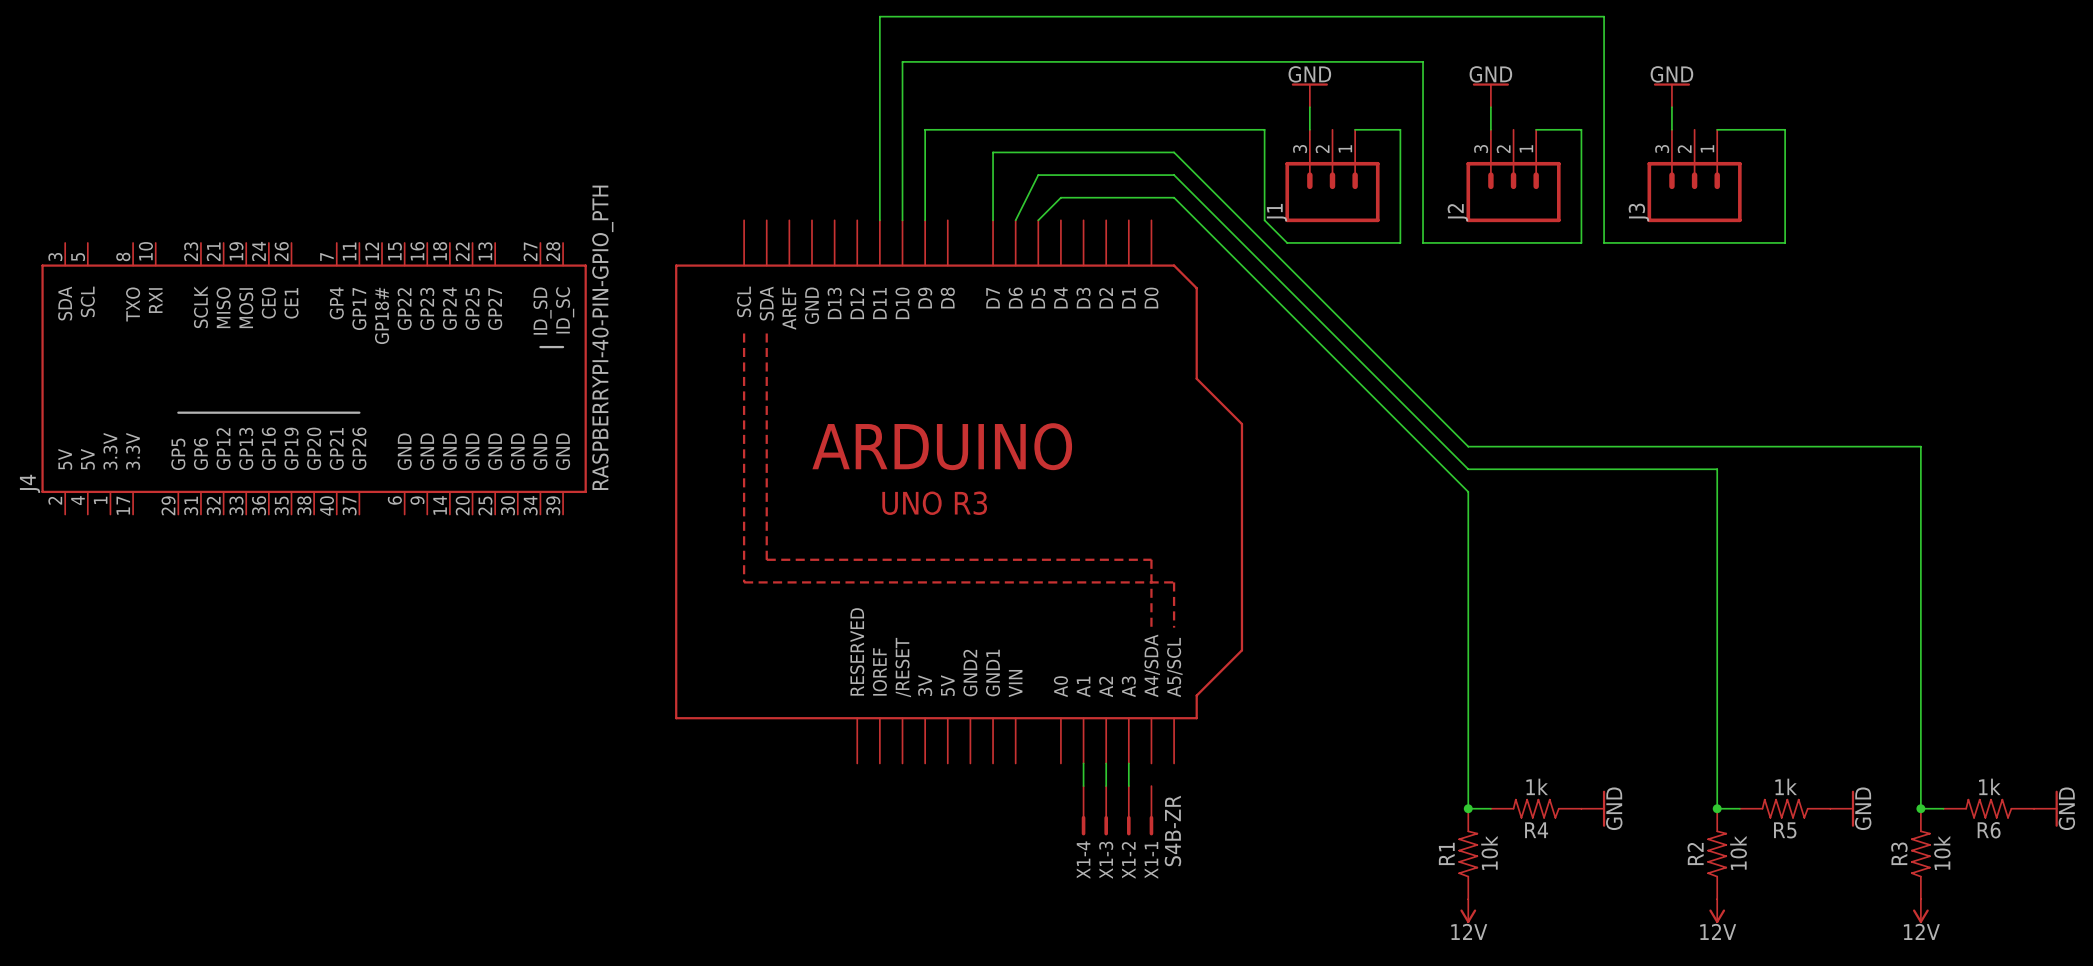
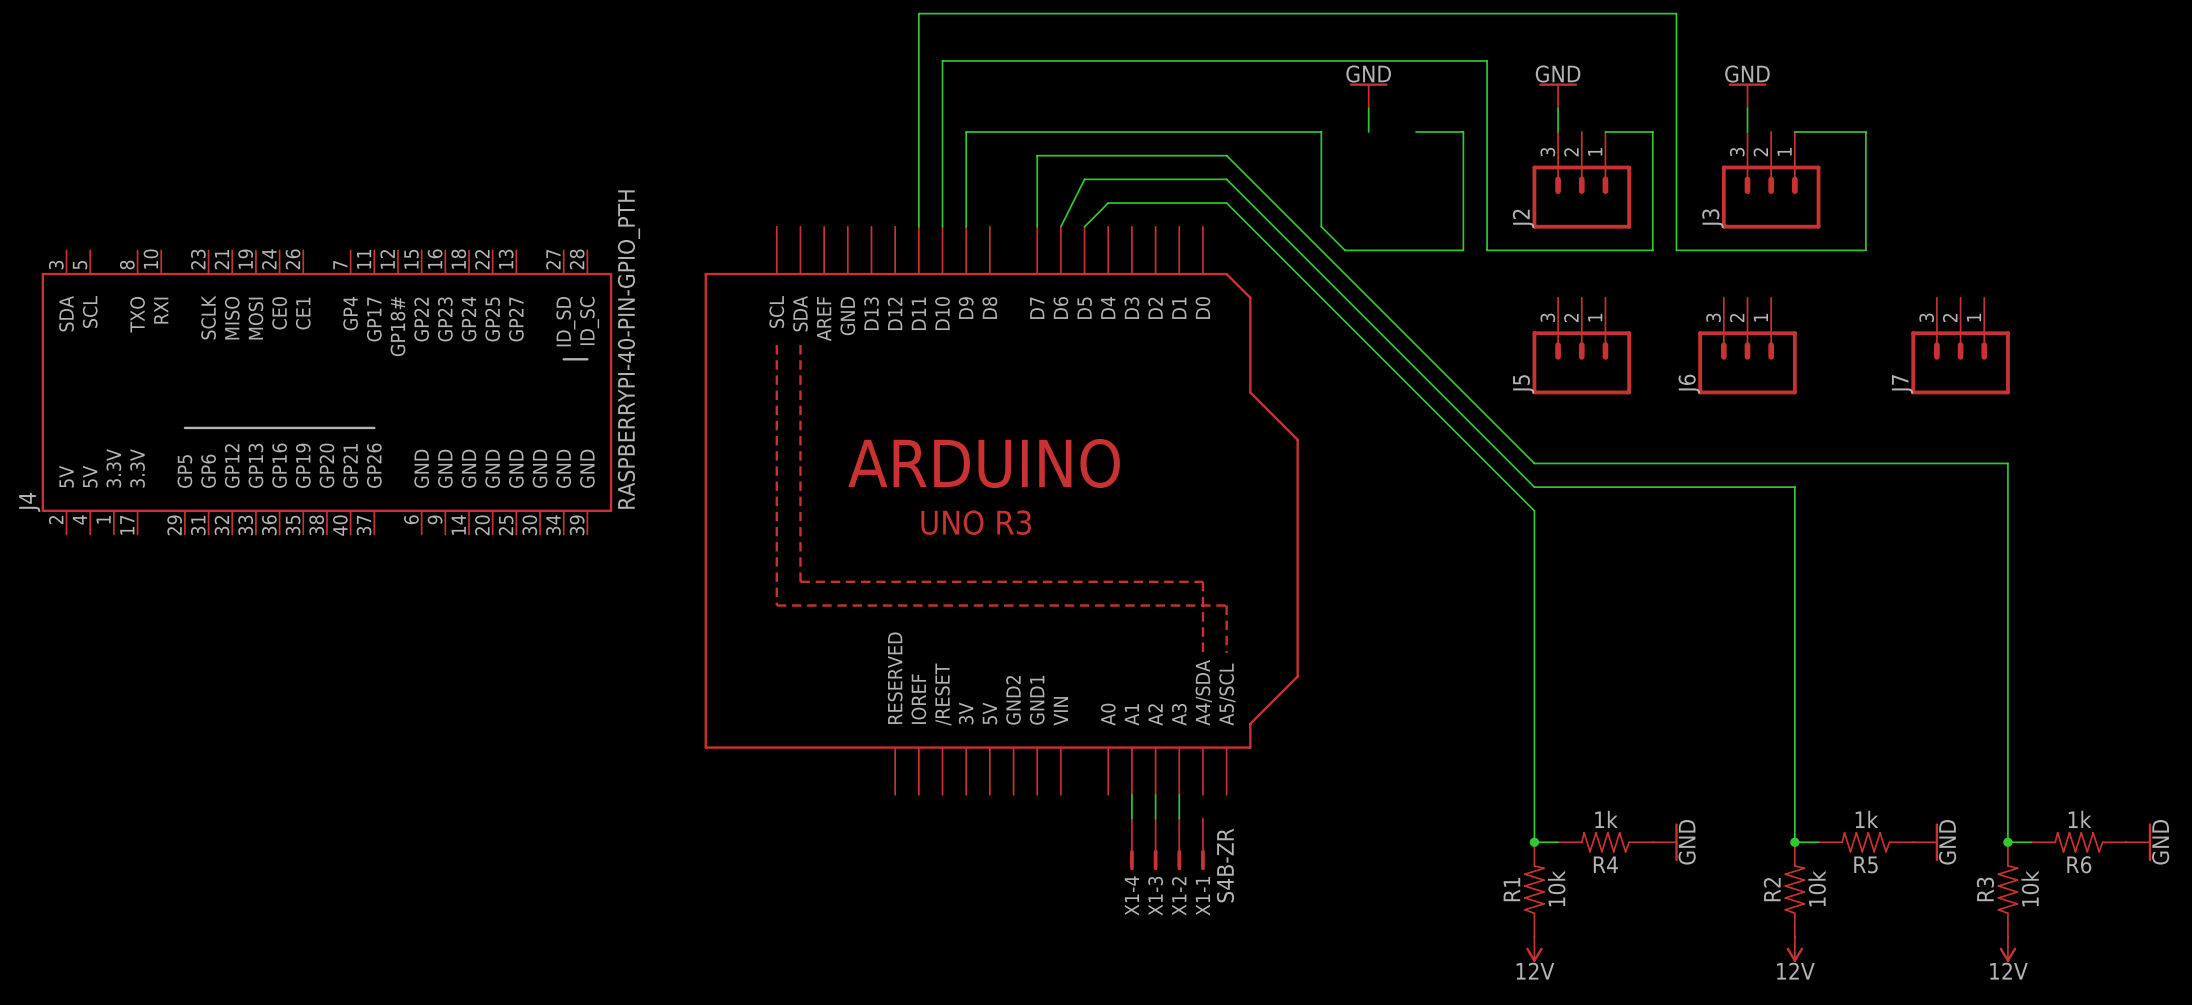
J1: (1332, 175) -> none
J5: none -> (1581, 346)
J6: none -> (1747, 346)
J7: none -> (1960, 346)

